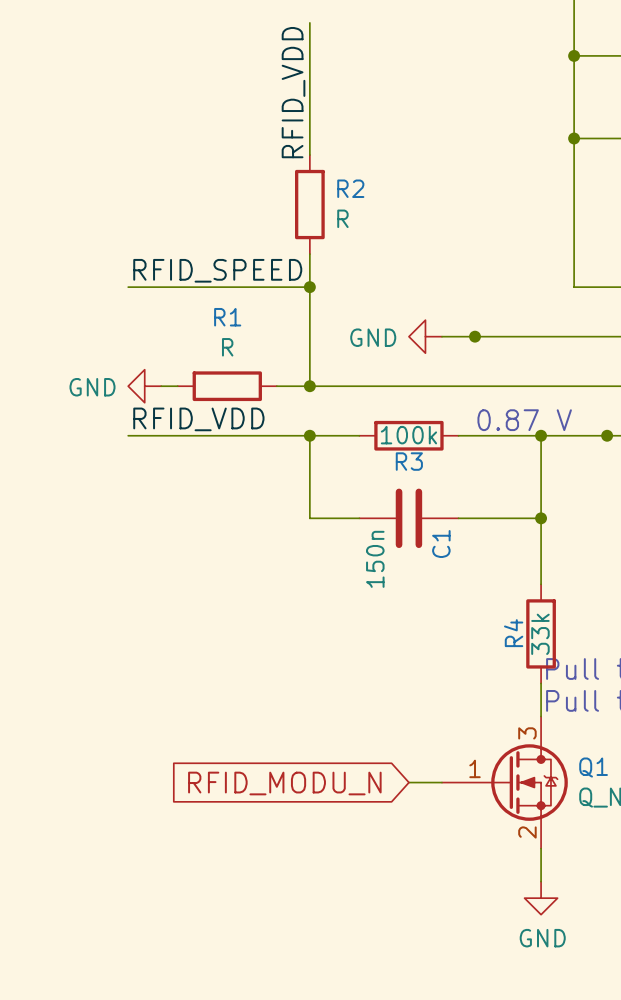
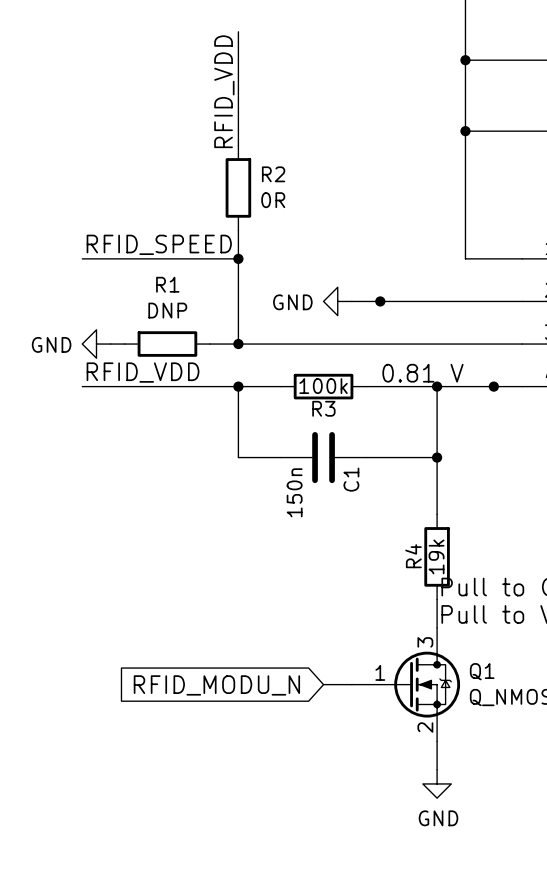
R2 value: R (342, 218) -> 0R (273, 200)
R1 value: R (227, 347) -> DNP (167, 310)
text: 0.87 V (524, 420) -> 0.81 V (422, 373)
R4 value: 33k (540, 634) -> 19k (436, 556)

